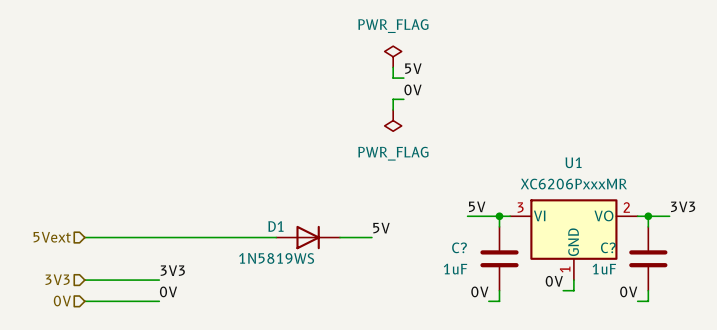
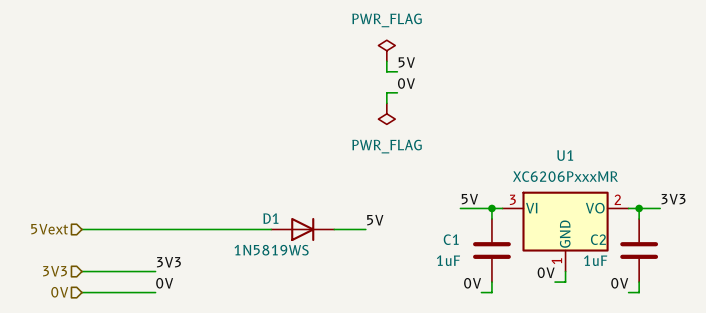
C? name: C? (459, 247) -> C1 (451, 239)
C? name: C? (608, 247) -> C2 (598, 239)

